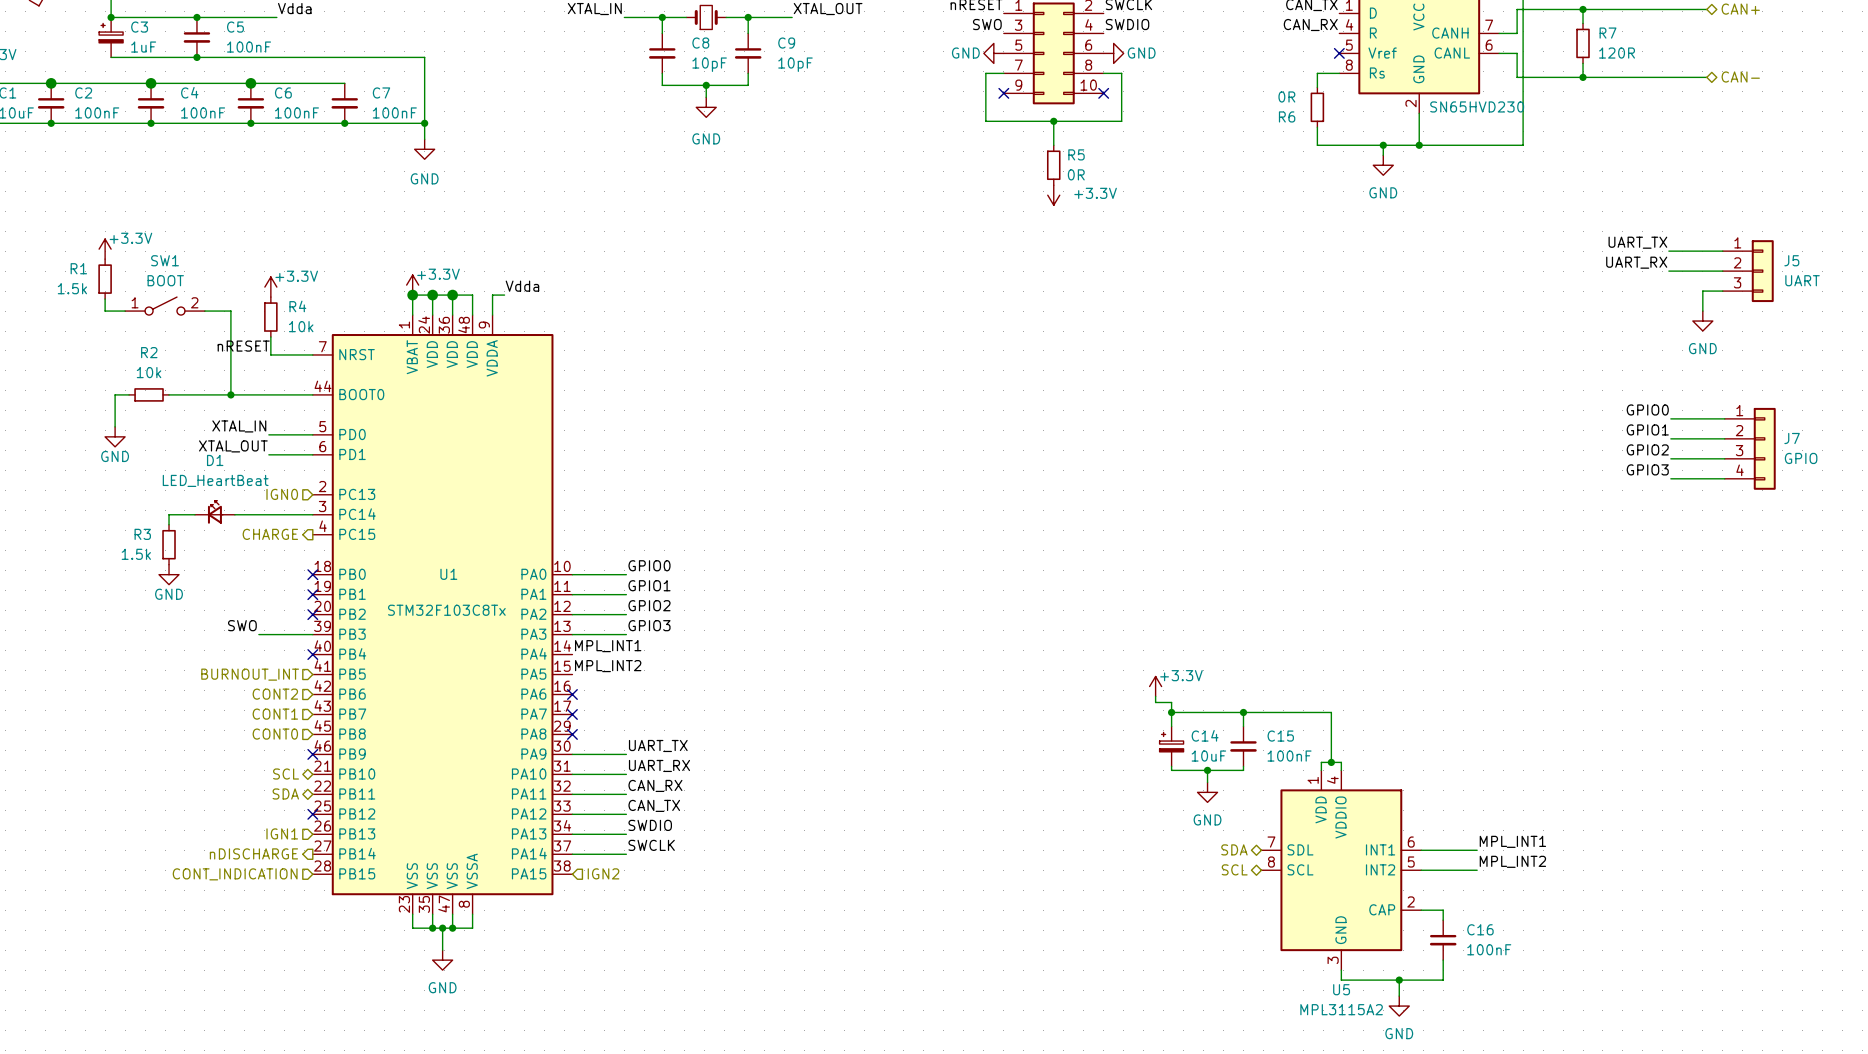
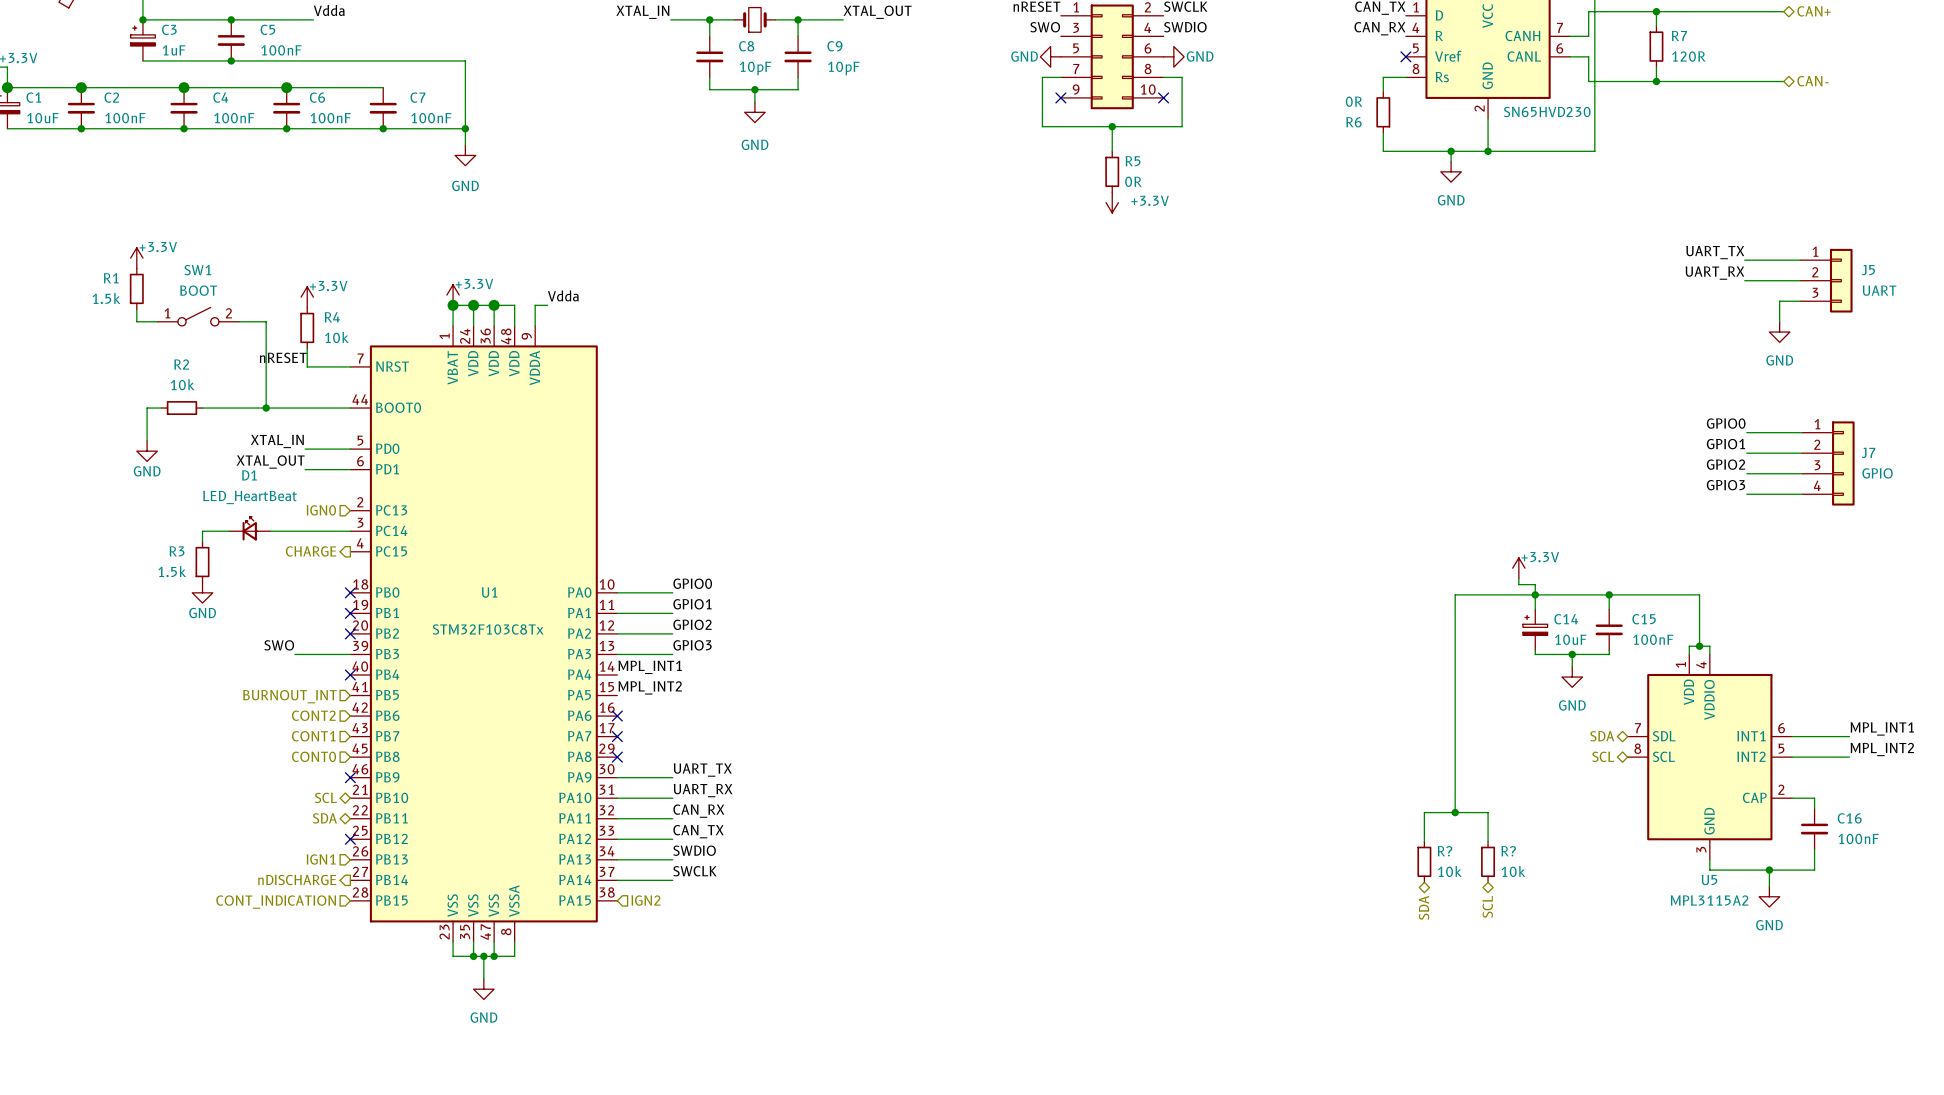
power symbol: none -> +3.3V (1518, 568)
wire: none -> (1518, 578) (1518, 584) (1535, 584) (1535, 609)
junction: none -> (1535, 594)
wire: none -> (1609, 594) (1609, 609)
junction: none -> (1609, 594)
wire: none -> (1699, 646) (1699, 594) (1455, 594) (1455, 812)
junction: none -> (1699, 646)
wire: none -> (1535, 650) (1535, 654) (1609, 654) (1609, 650)
wire: none -> (1572, 654) (1572, 666)
junction: none -> (1572, 654)
wire: none -> (1689, 654) (1689, 646) (1709, 646) (1709, 654)
power symbol: none -> GND (1572, 677)
power symbol: +3.3V (1155, 686) -> none
wire: (1155, 696) (1155, 702) (1171, 702) (1171, 726) -> none
label: none -> MPL_INT1 (1882, 728)
wire: (1171, 712) (1331, 712) (1331, 762) -> none
junction: (1171, 712) -> none
wire: (1243, 712) (1243, 726) -> none
junction: (1243, 712) -> none
hierarchical label: none -> SDA (1602, 736)
wire: none -> (1791, 736) (1849, 736)
label: none -> MPL_INT2 (1882, 749)
hierarchical label: none -> SCL (1603, 756)
wire: none -> (1791, 757) (1849, 757)
C14 position: (1171, 746) -> (1535, 629)
C15 position: (1243, 746) -> (1609, 629)
junction: (1331, 762) -> none
wire: (1171, 766) (1171, 770) (1243, 770) (1243, 766) -> none
wire: (1207, 770) (1207, 782) -> none
junction: (1207, 770) -> none
wire: (1321, 770) (1321, 762) (1341, 762) (1341, 770) -> none
wire: none -> (1791, 798) (1814, 798) (1814, 808)
junction: none -> (1455, 812)
power symbol: GND (1207, 792) -> none
wire: none -> (1424, 841) (1424, 812) (1488, 812) (1488, 841)
wire: none -> (1814, 849) (1814, 870) (1709, 870) (1709, 859)
R?: none -> 10k (1424, 861)
R?: none -> 10k (1488, 861)
label: MPL_INT1 (1512, 841) -> none
wire: none -> (1769, 870) (1769, 886)
junction: none -> (1769, 870)
hierarchical label rotation: 0° (1234, 849) -> 90° counterclockwise (1424, 907)
hierarchical label position: SDA (1234, 849) -> SDA (1424, 907)
wire: (1421, 850) (1477, 850) -> none
label: MPL_INT2 (1512, 861) -> none
hierarchical label: SCL (1234, 869) -> none
U5 position: (1341, 870) -> (1709, 757)
wire: (1421, 870) (1477, 870) -> none
power symbol: none -> GND (1769, 896)
hierarchical label: none -> SCL (1487, 906)
wire: (1421, 910) (1443, 910) (1443, 920) -> none
C16 position: (1443, 940) -> (1814, 829)
wire: (1443, 960) (1443, 980) (1341, 980) (1341, 970) -> none
wire: (1399, 980) (1399, 996) -> none
junction: (1399, 980) -> none
power symbol: GND (1399, 1006) -> none

